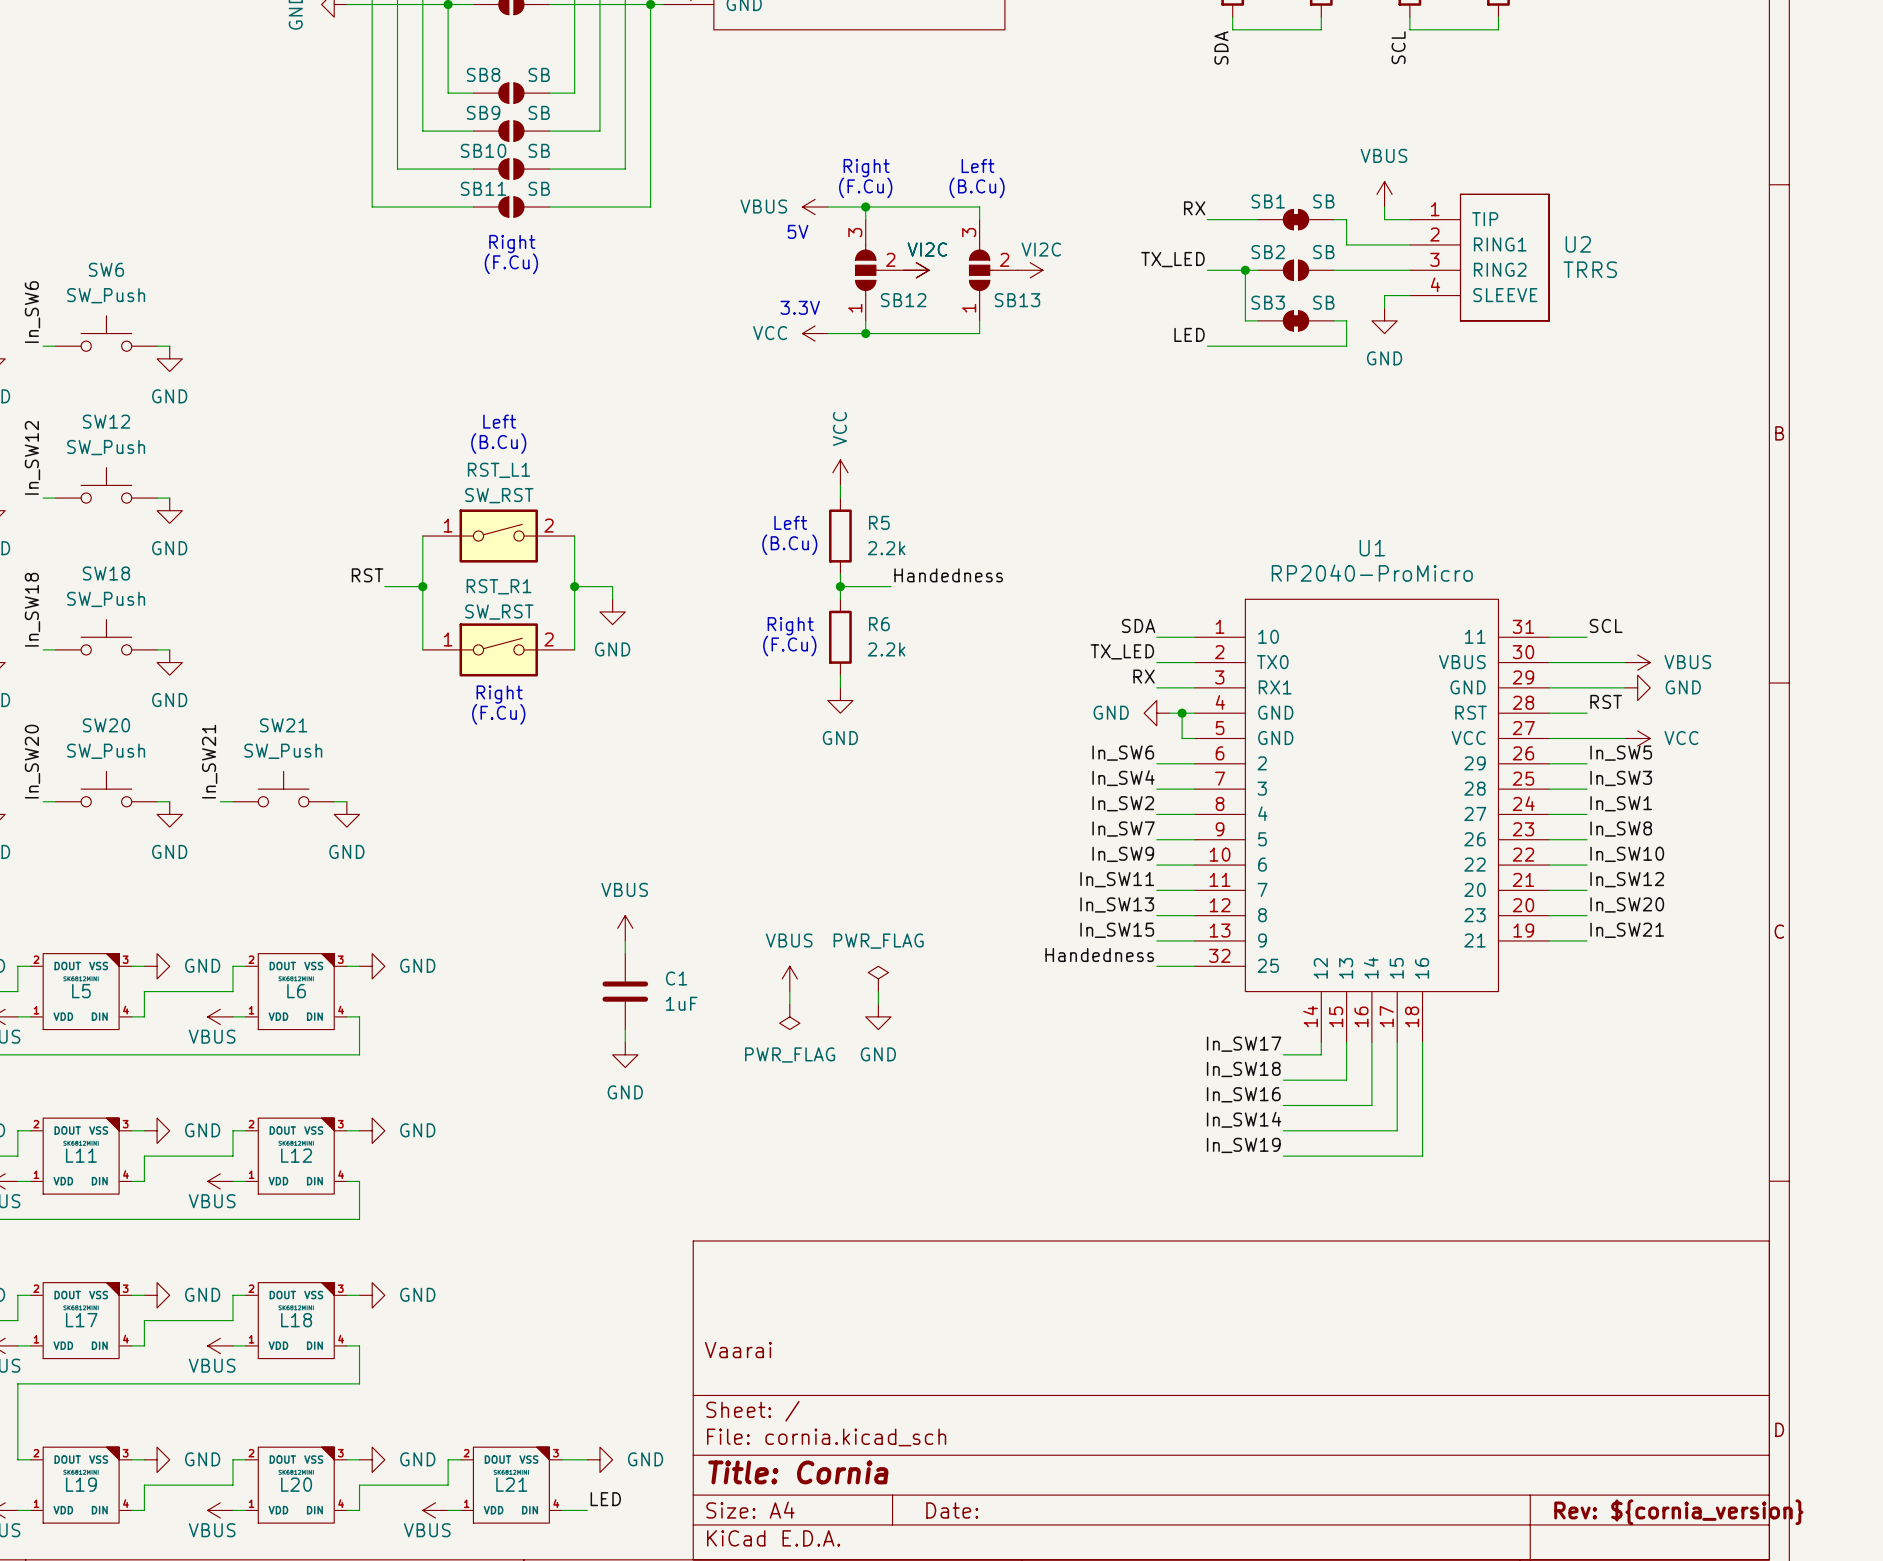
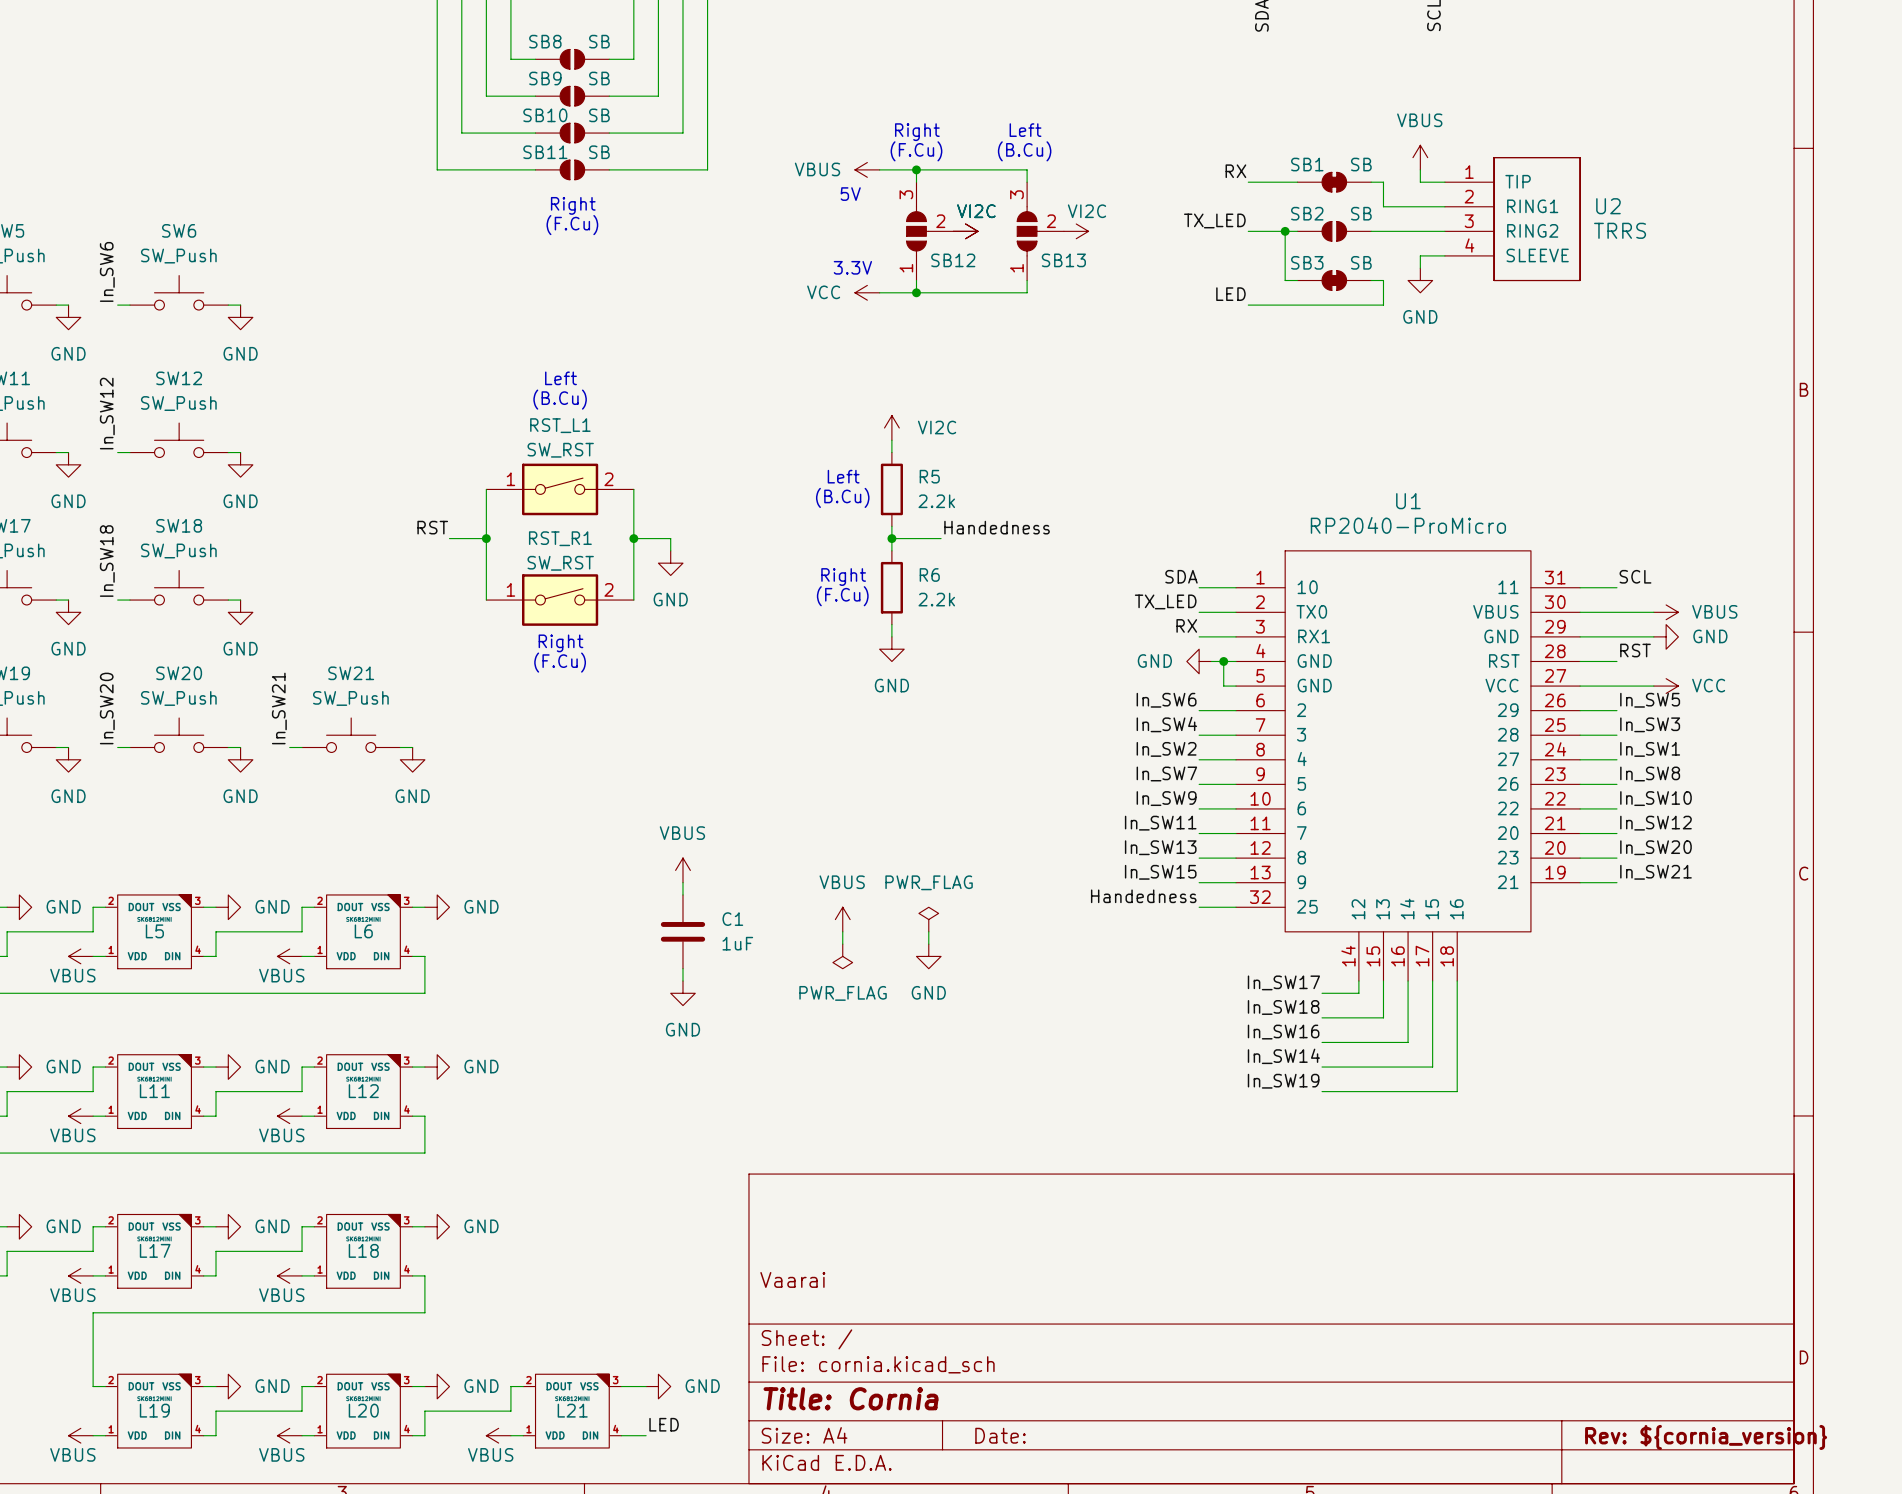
power symbol: VCC (840, 472) -> VI2C (891, 427)

